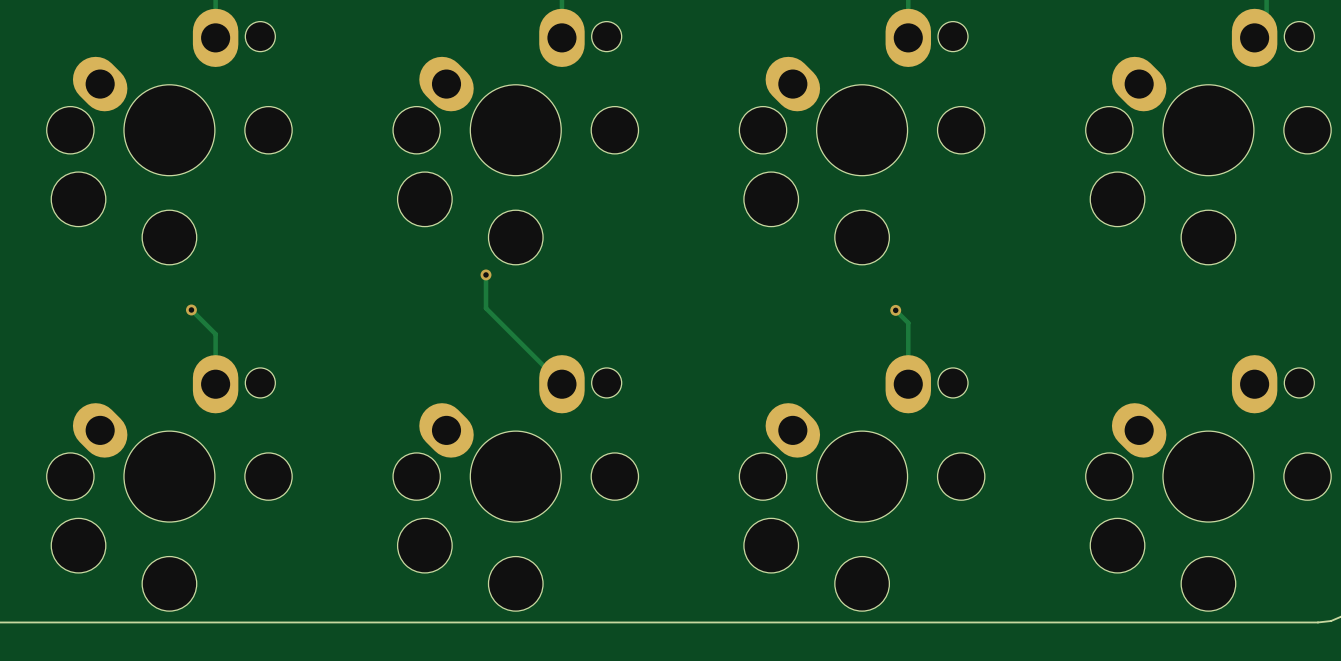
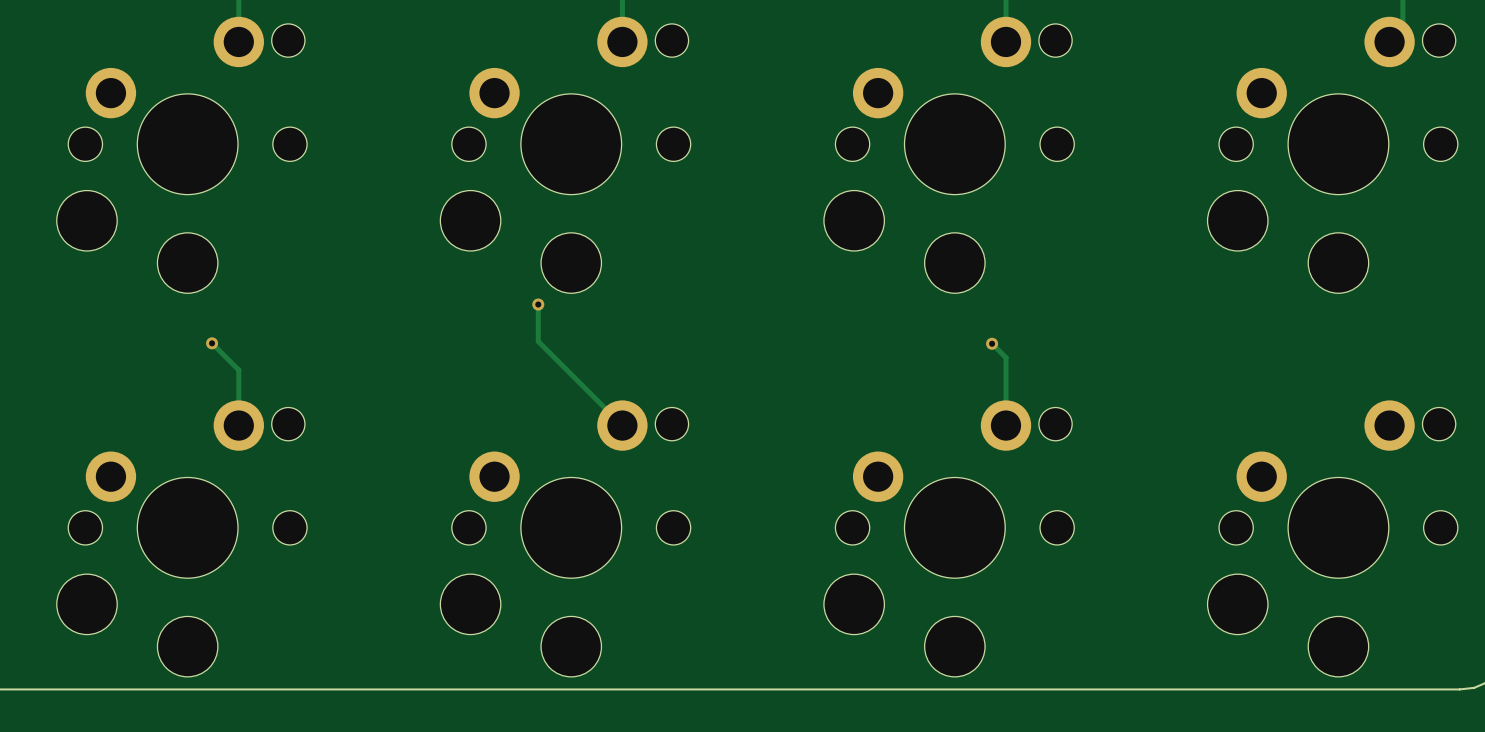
part footprint: [46, 8, 293, 265] -> [56, 16, 308, 294]
part footprint: [393, 8, 639, 265] -> [440, 16, 691, 294]
part footprint: [739, 8, 985, 265] -> [823, 16, 1075, 294]
part footprint: [1085, 8, 1332, 265] -> [1207, 16, 1458, 294]
part footprint: [46, 355, 293, 612] -> [56, 400, 308, 677]
part footprint: [393, 355, 639, 612] -> [440, 400, 691, 677]
part footprint: [739, 355, 985, 612] -> [823, 400, 1075, 677]
part footprint: [1085, 355, 1332, 612] -> [1207, 400, 1458, 677]

